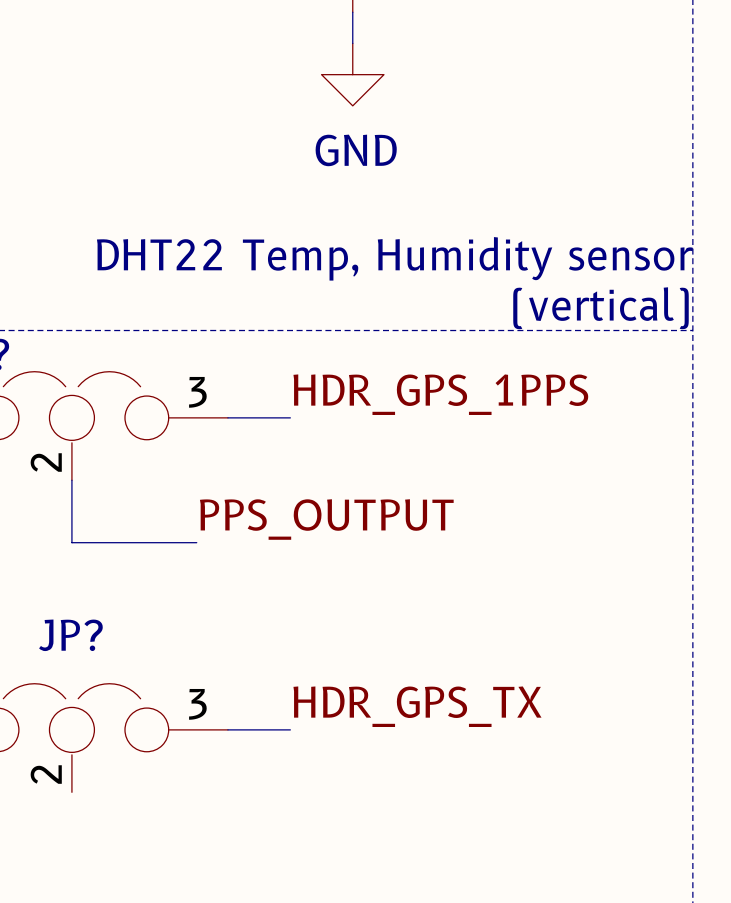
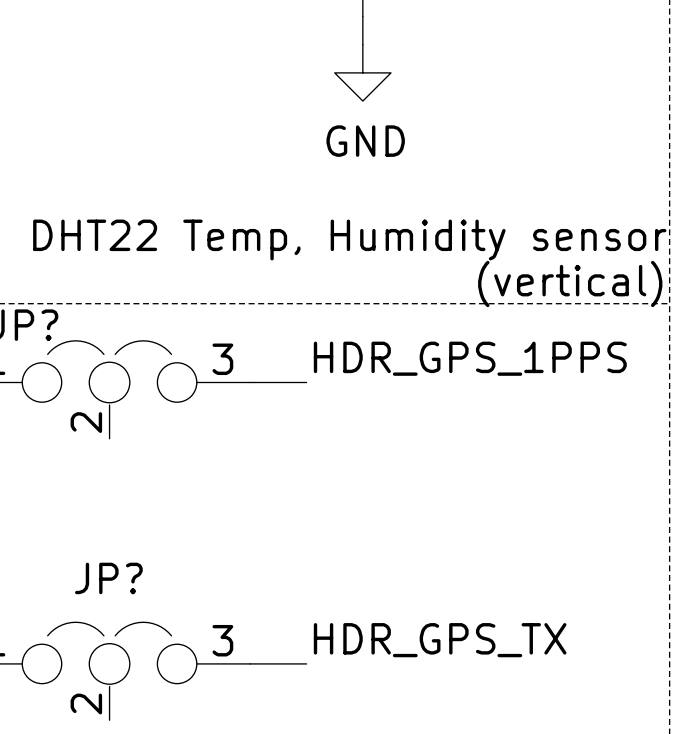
wire: (71, 480) (71, 542) (196, 542) -> none
label: PPS_OUTPUT (326, 519) -> none

